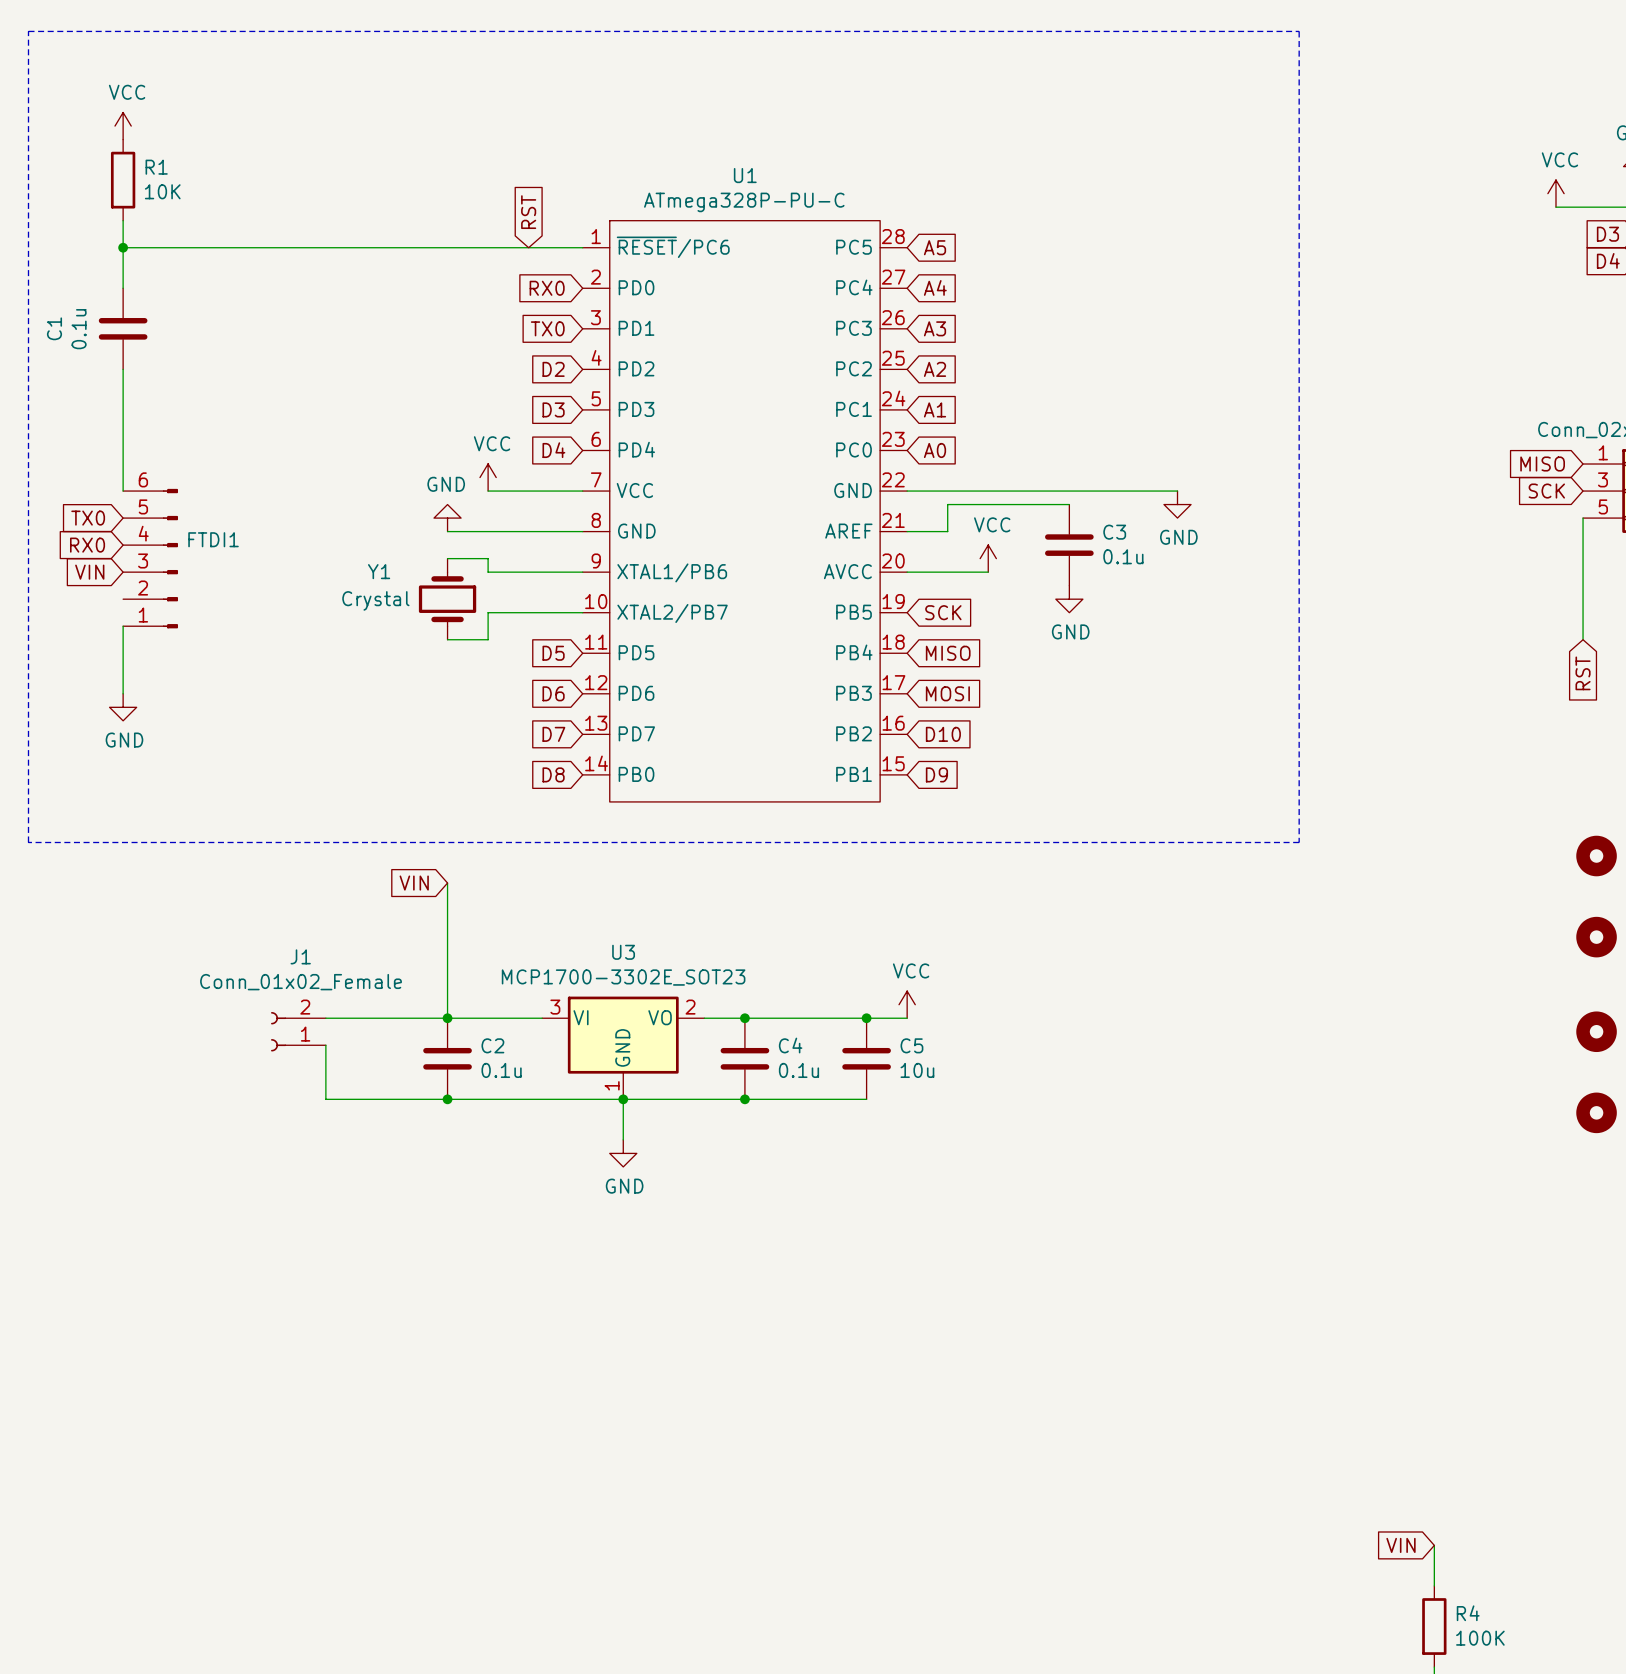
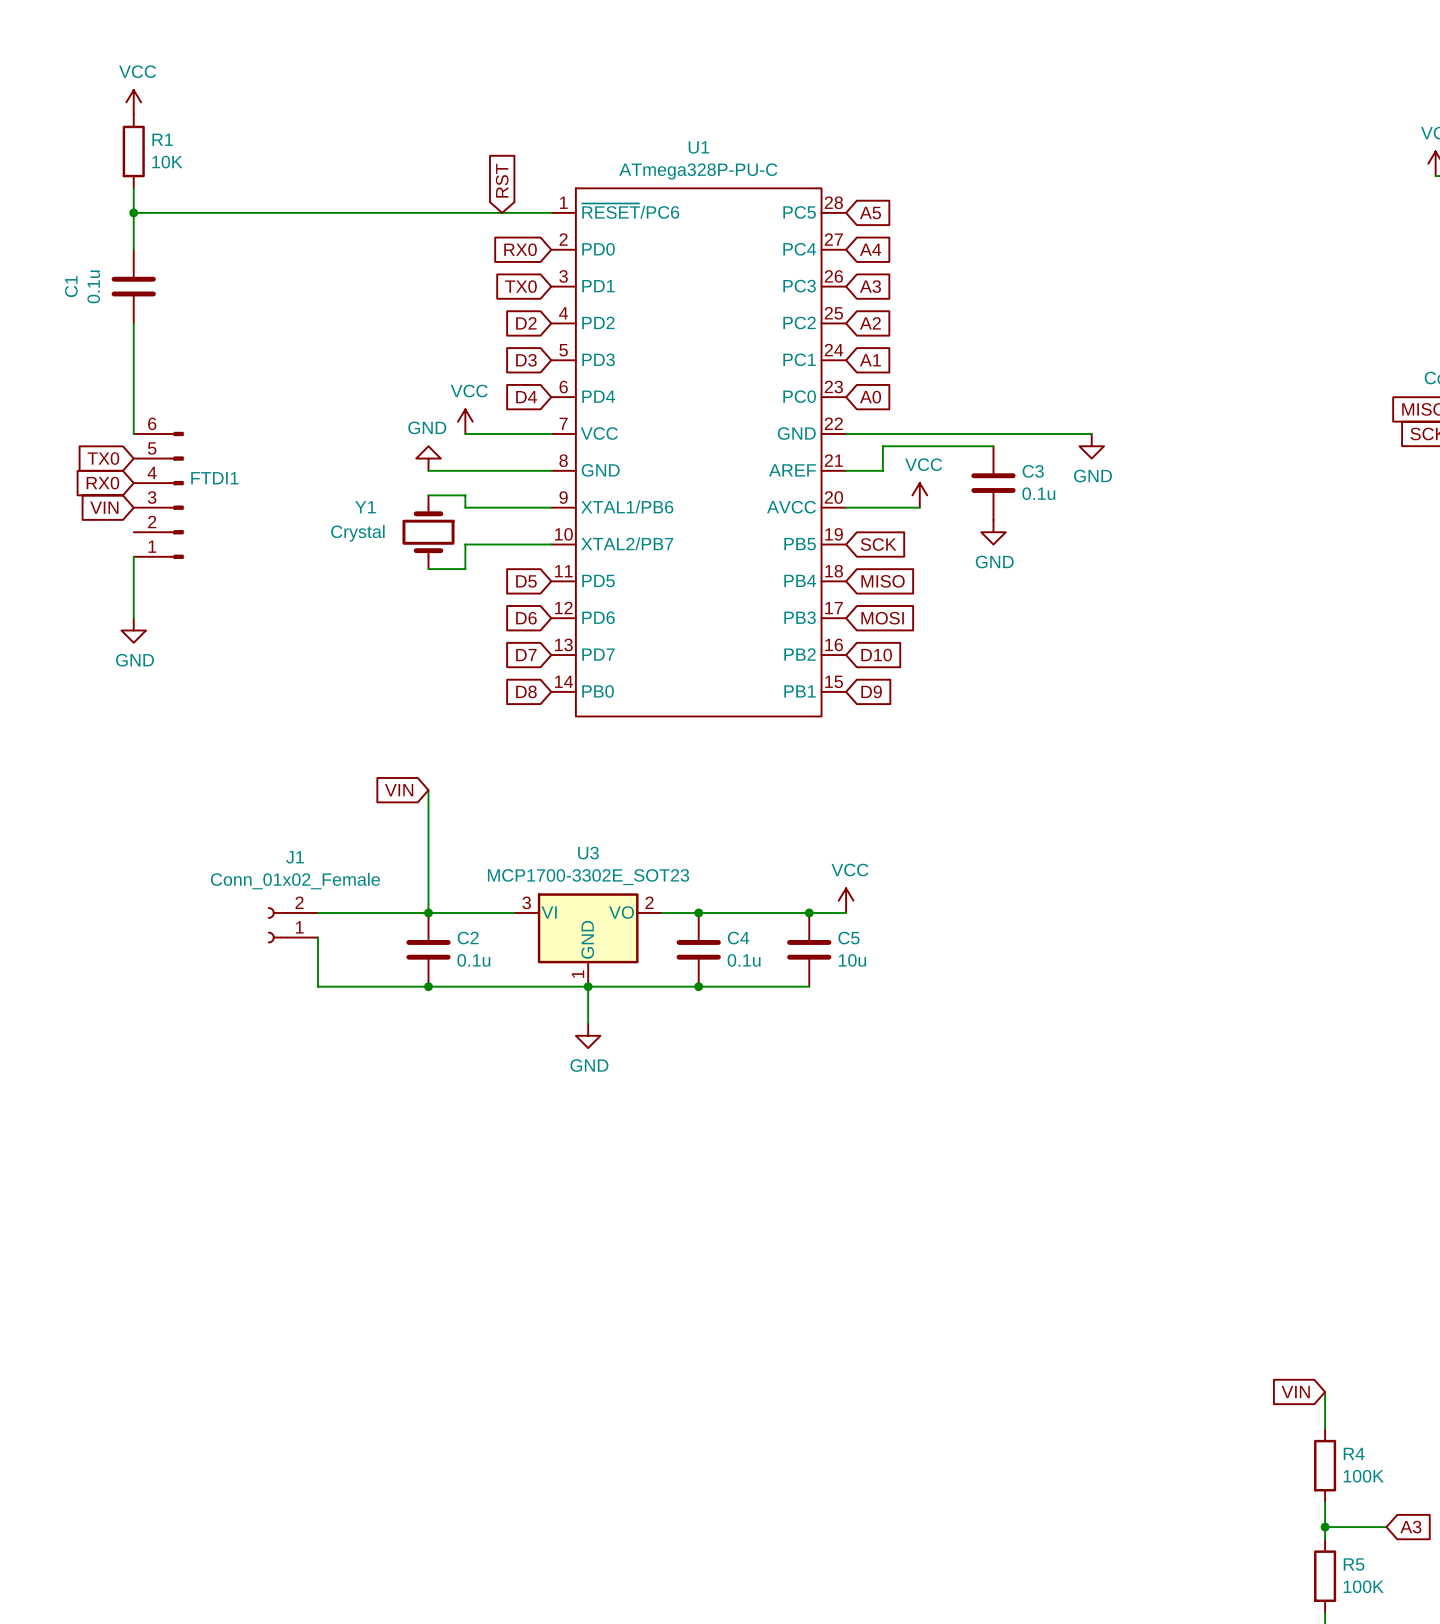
line: (28, 31) (1299, 31) (1299, 842) (28, 842) (28, 31) -> none

